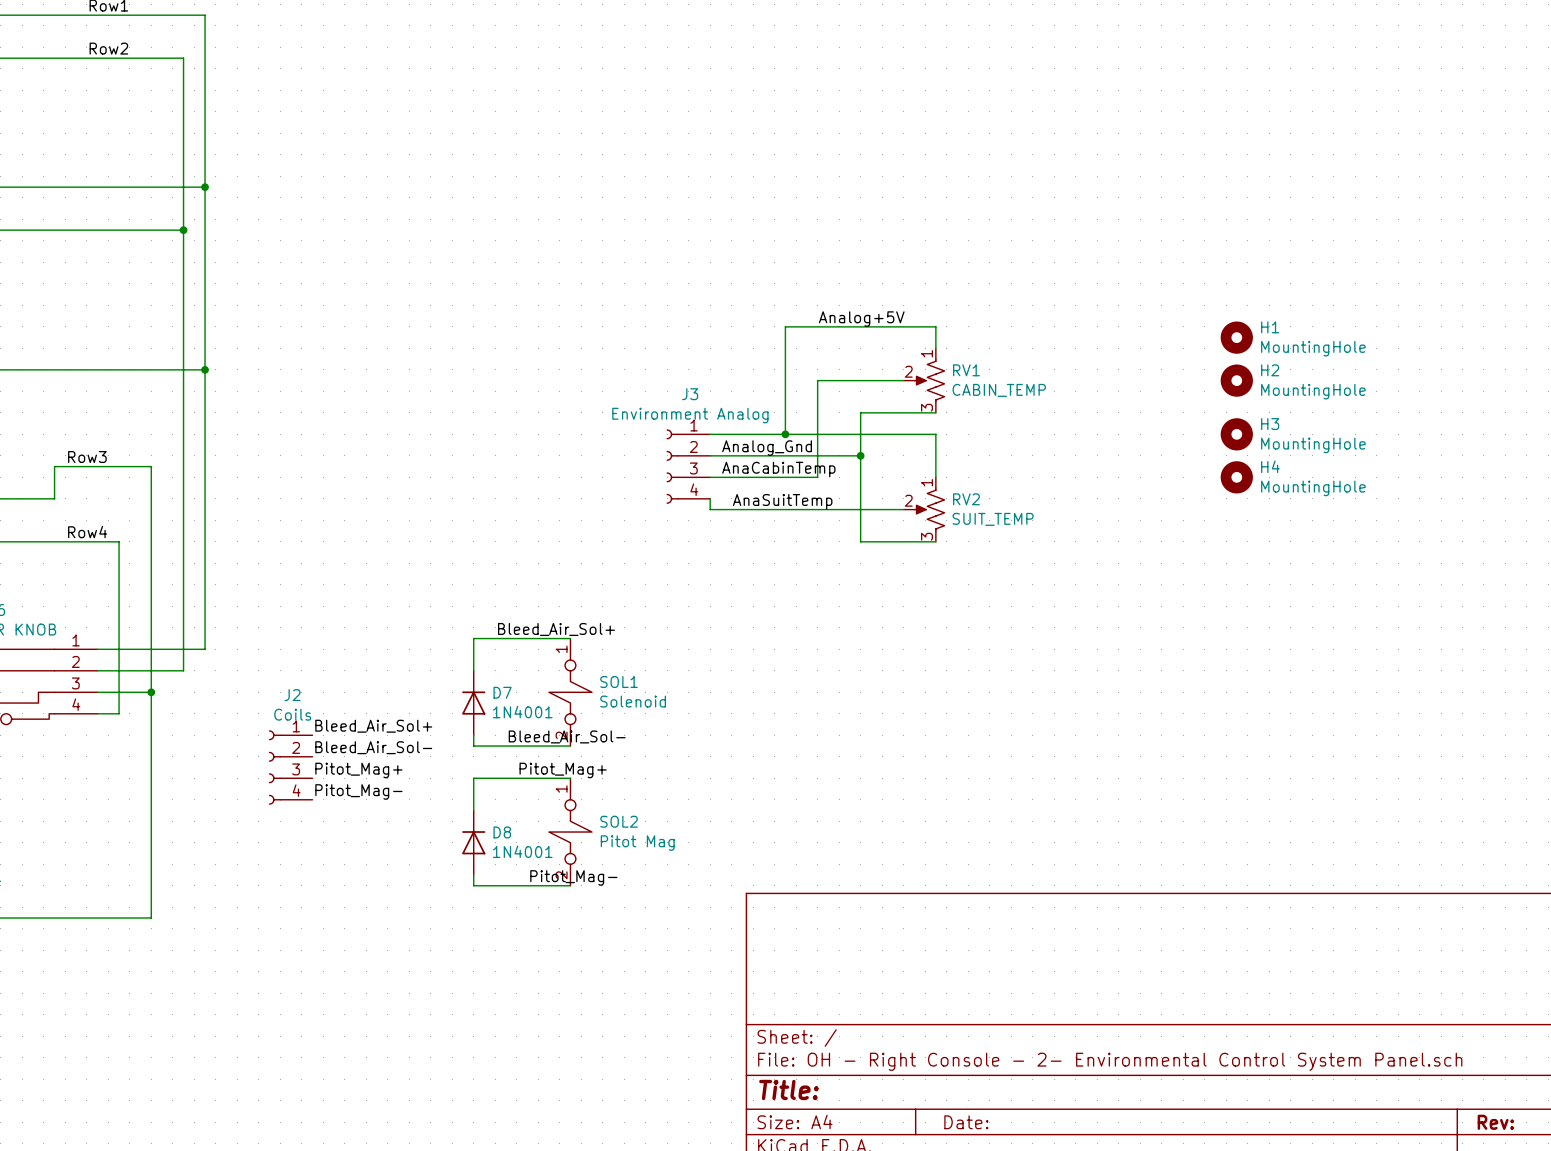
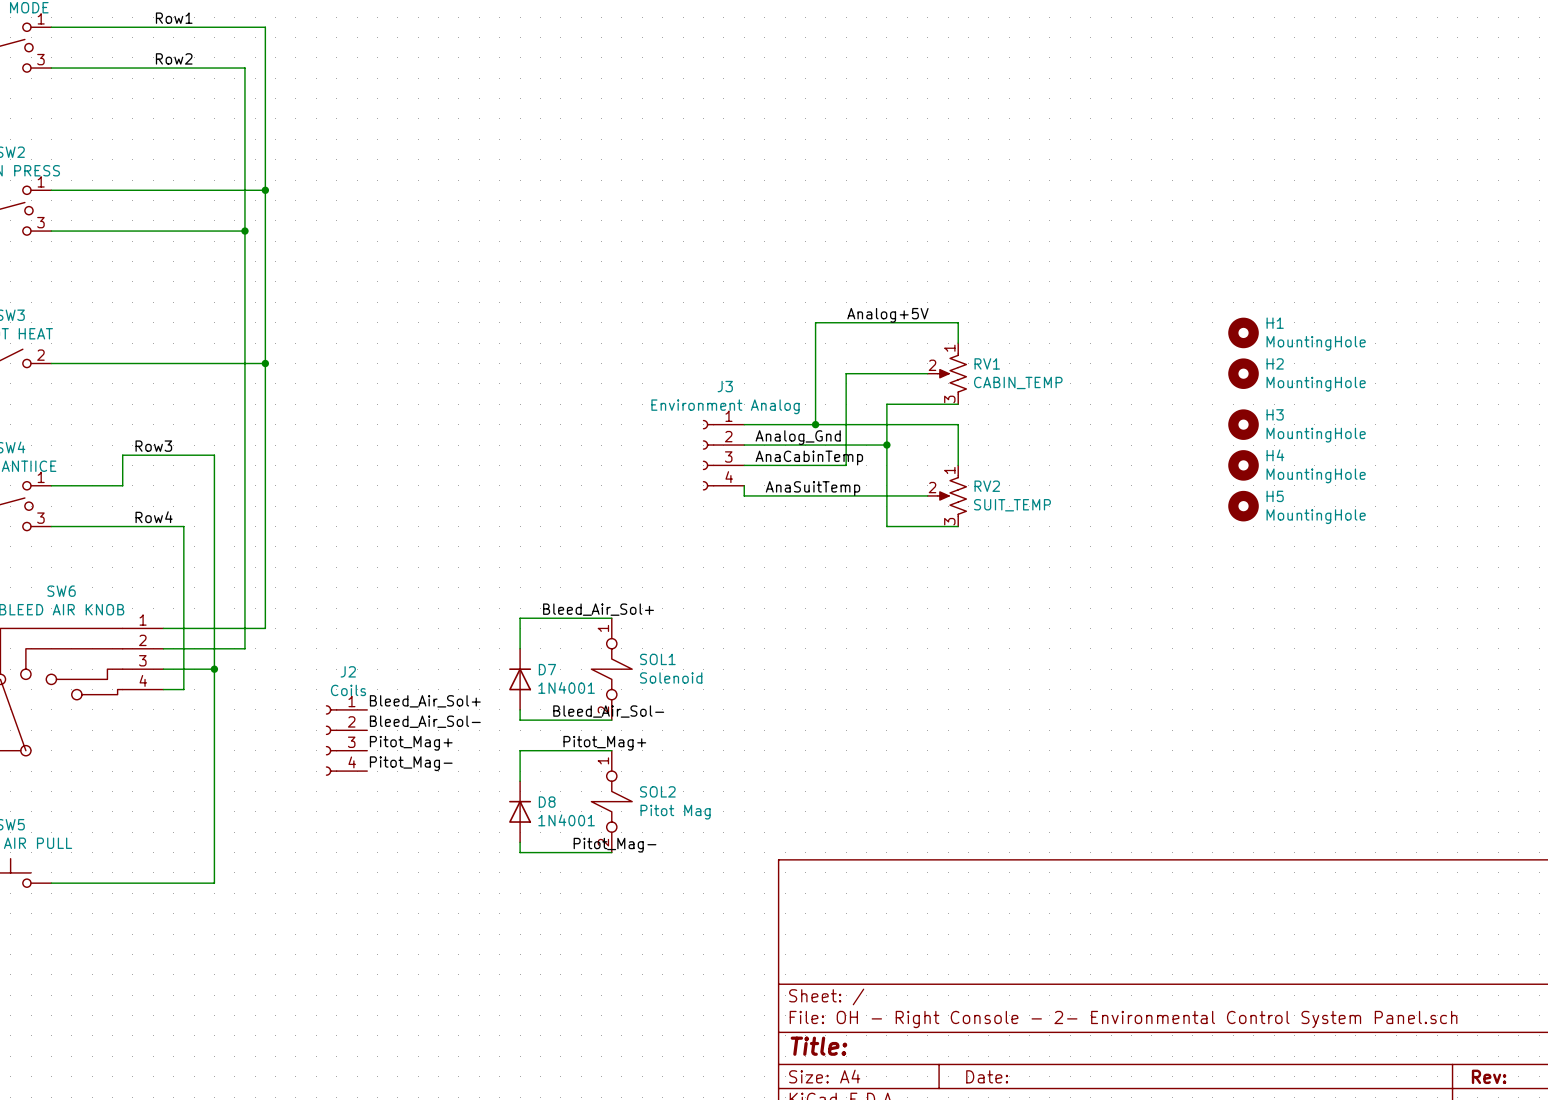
H5: none -> MountingHole (1243, 506)

